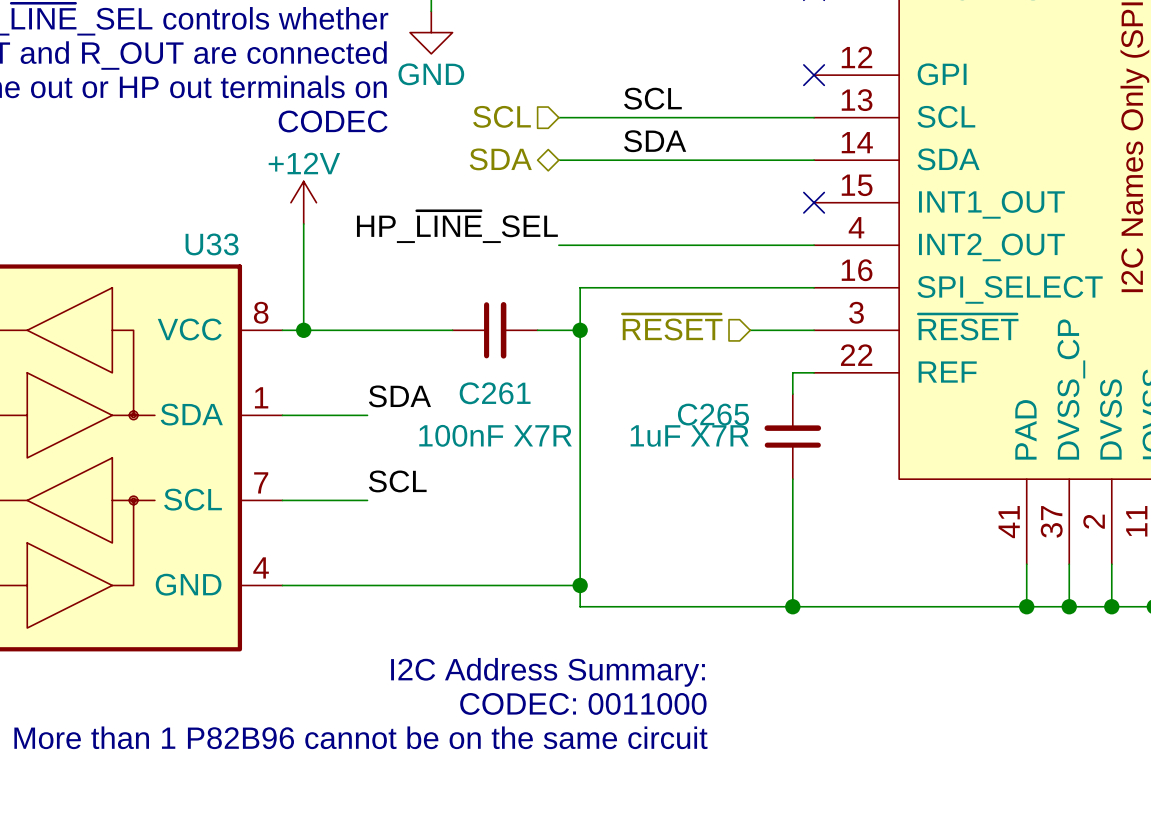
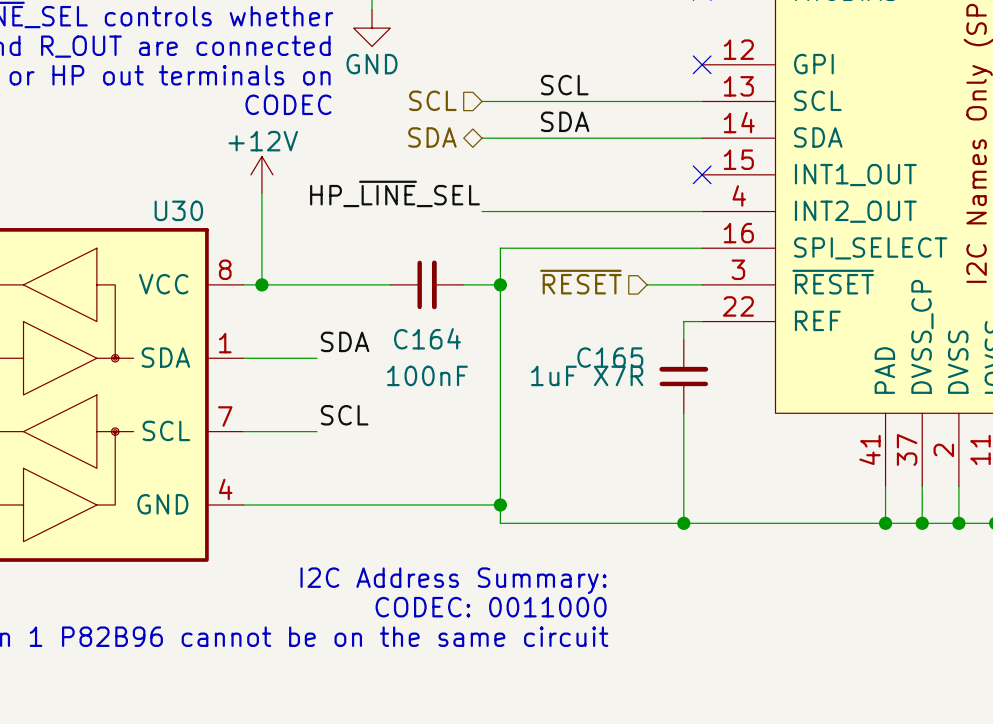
U33 name: U33 (212, 244) -> U30 (178, 210)
C261 name: C261 (495, 393) -> C164 (427, 338)
C265 name: C265 (713, 414) -> C165 (610, 357)
C261 value: 100nF X7R (495, 435) -> 100nF (427, 375)

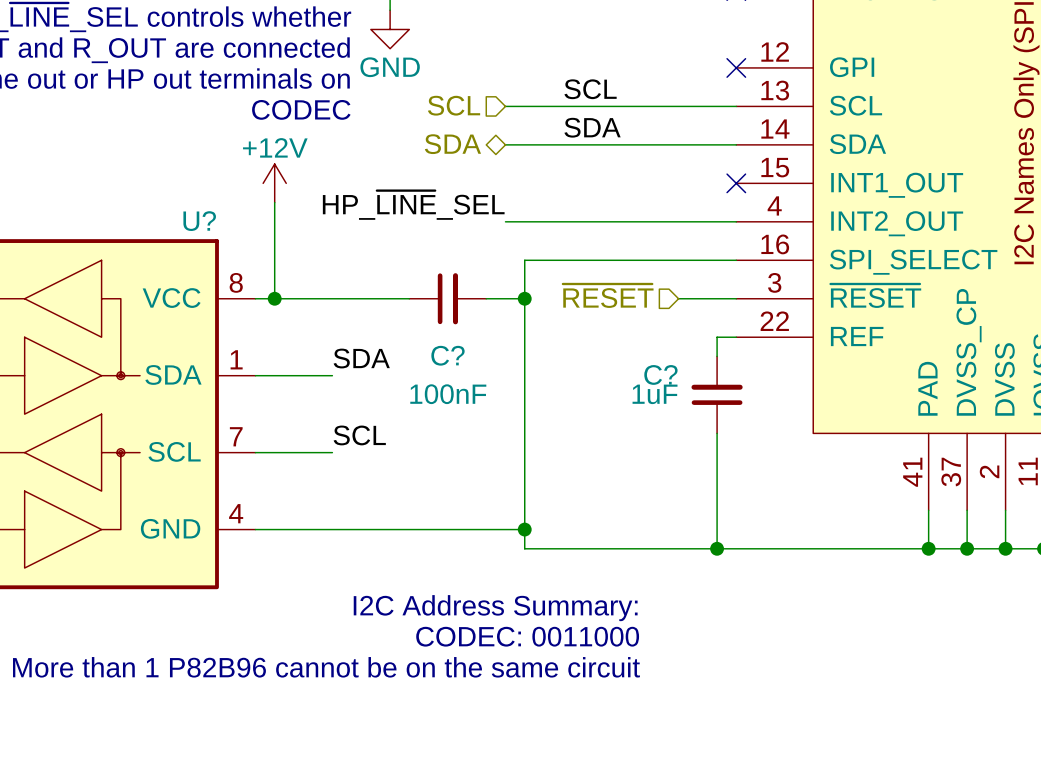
U30 name: U30 (178, 210) -> U? (199, 221)
C164 name: C164 (427, 338) -> C? (447, 355)
C165 name: C165 (610, 357) -> C? (660, 374)
C165 value: 1uF X7R (587, 375) -> 1uF (655, 394)

